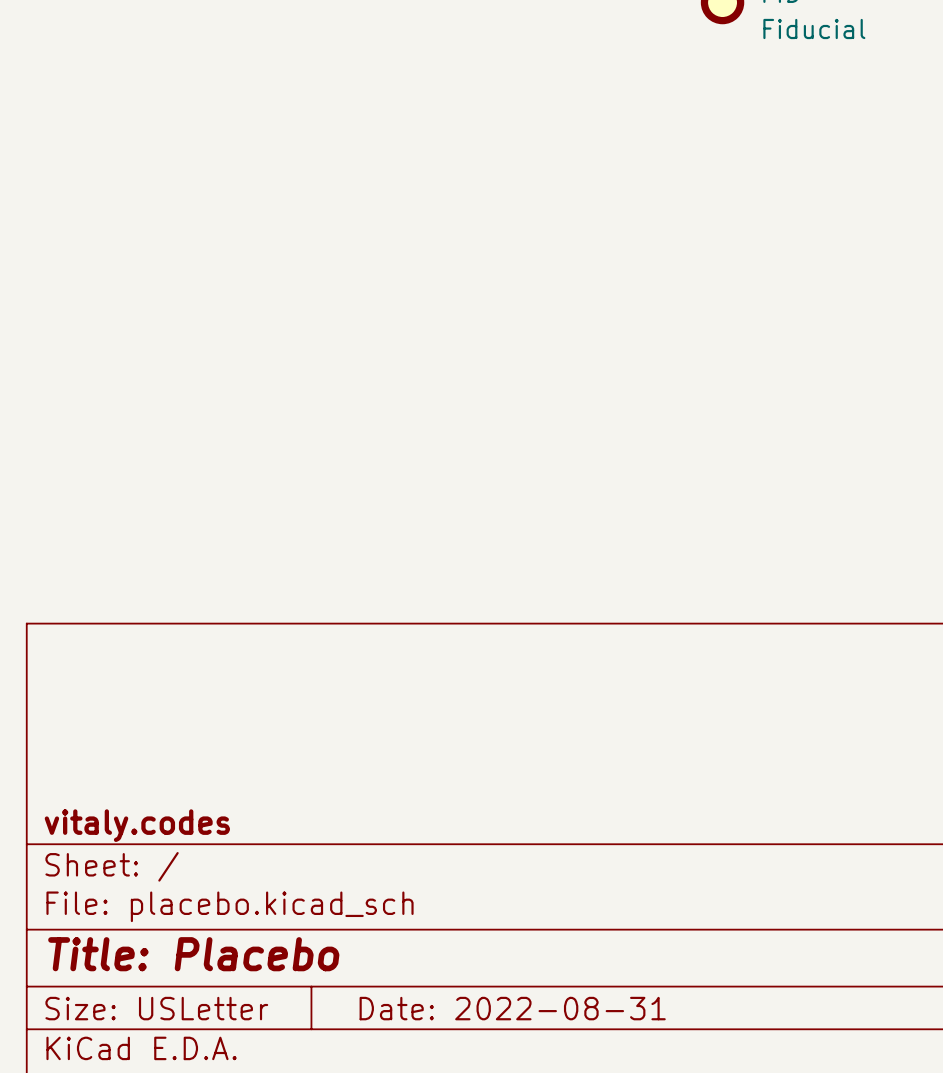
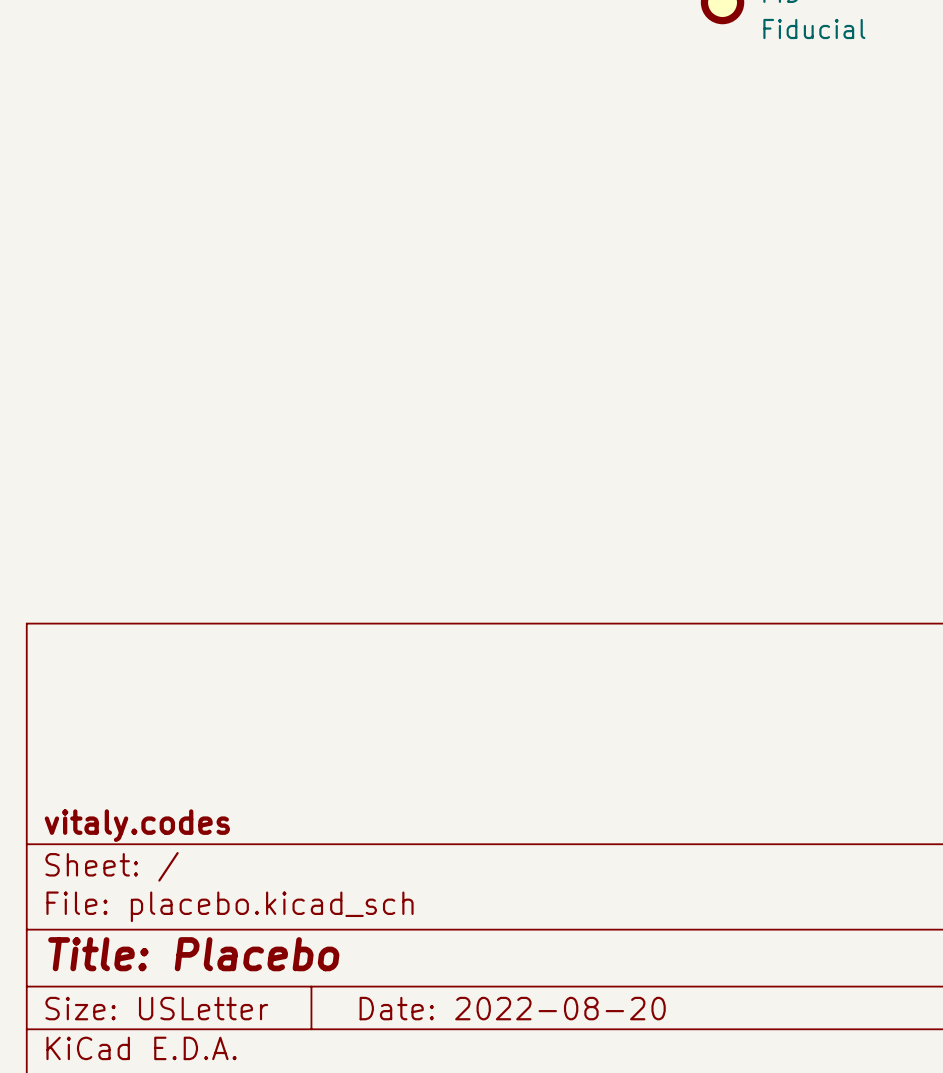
title block: Date: 2022-08-31 (512, 1008) -> Date: 2022-08-20 (512, 1008)

